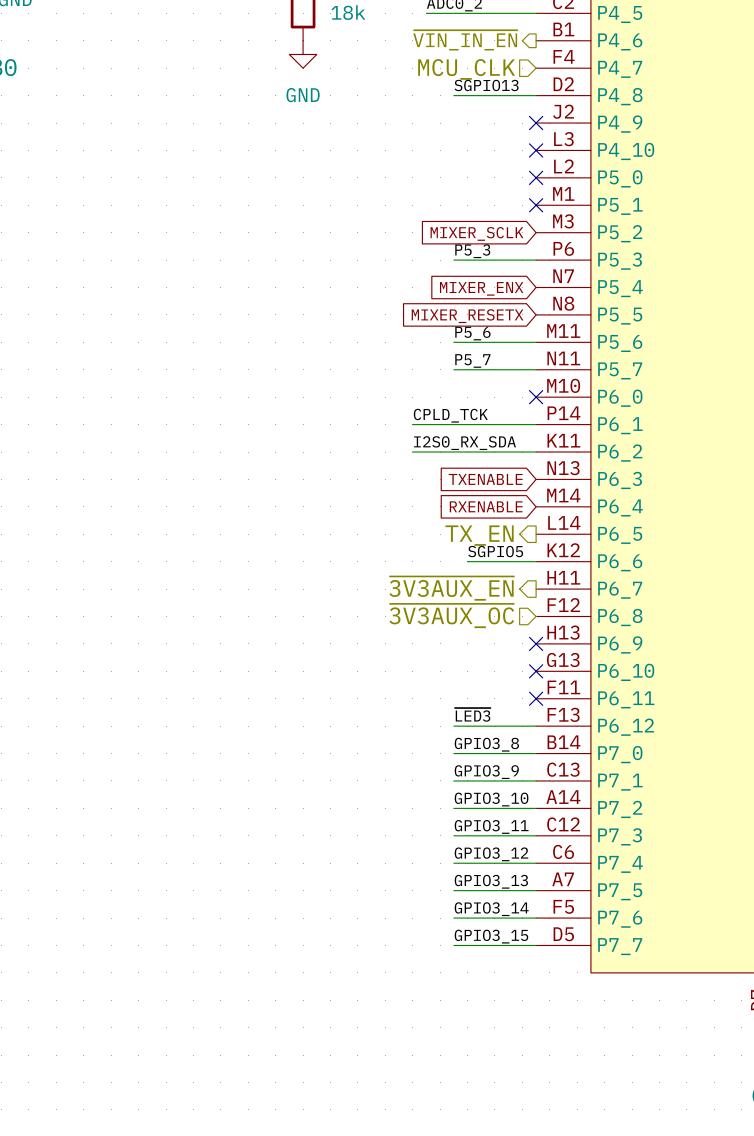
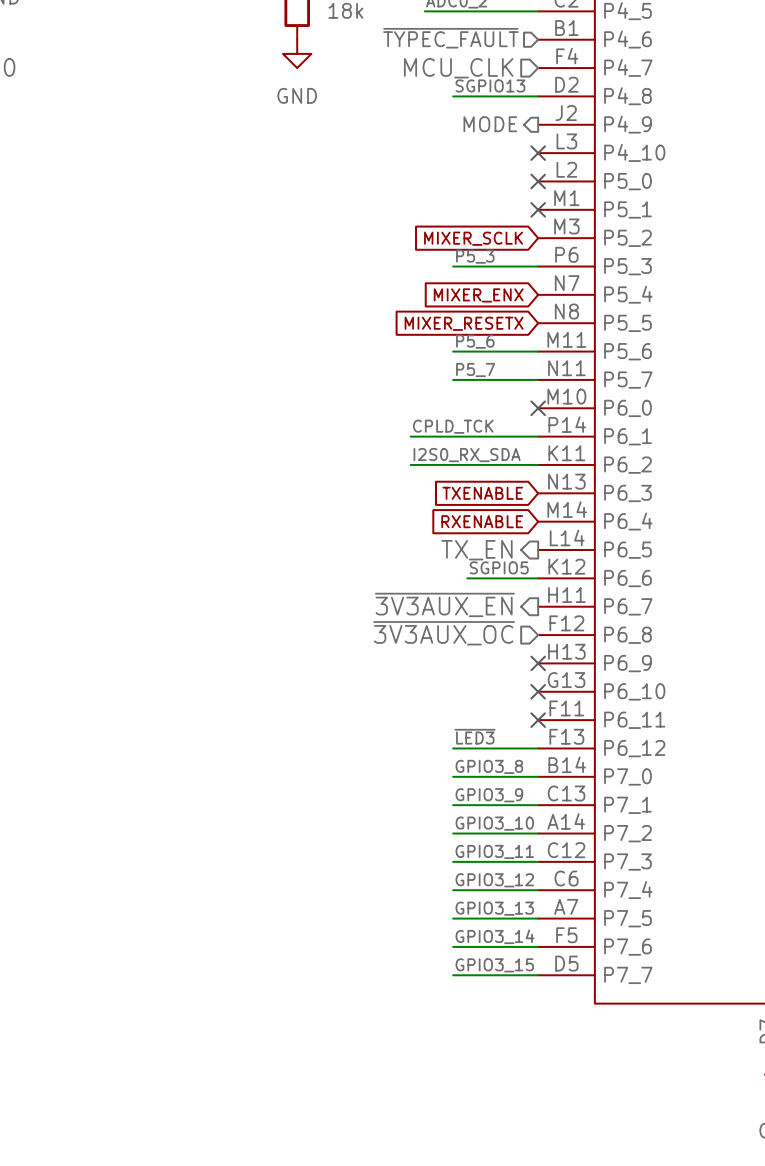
hierarchical label shape: output (465, 40) -> input (450, 38)
hierarchical label: ~{VIN_IN_EN} (465, 40) -> ~{TYPEC_FAULT} (450, 38)
hierarchical label: none -> MODE (490, 124)
no-connect mark: (536, 123) -> none

